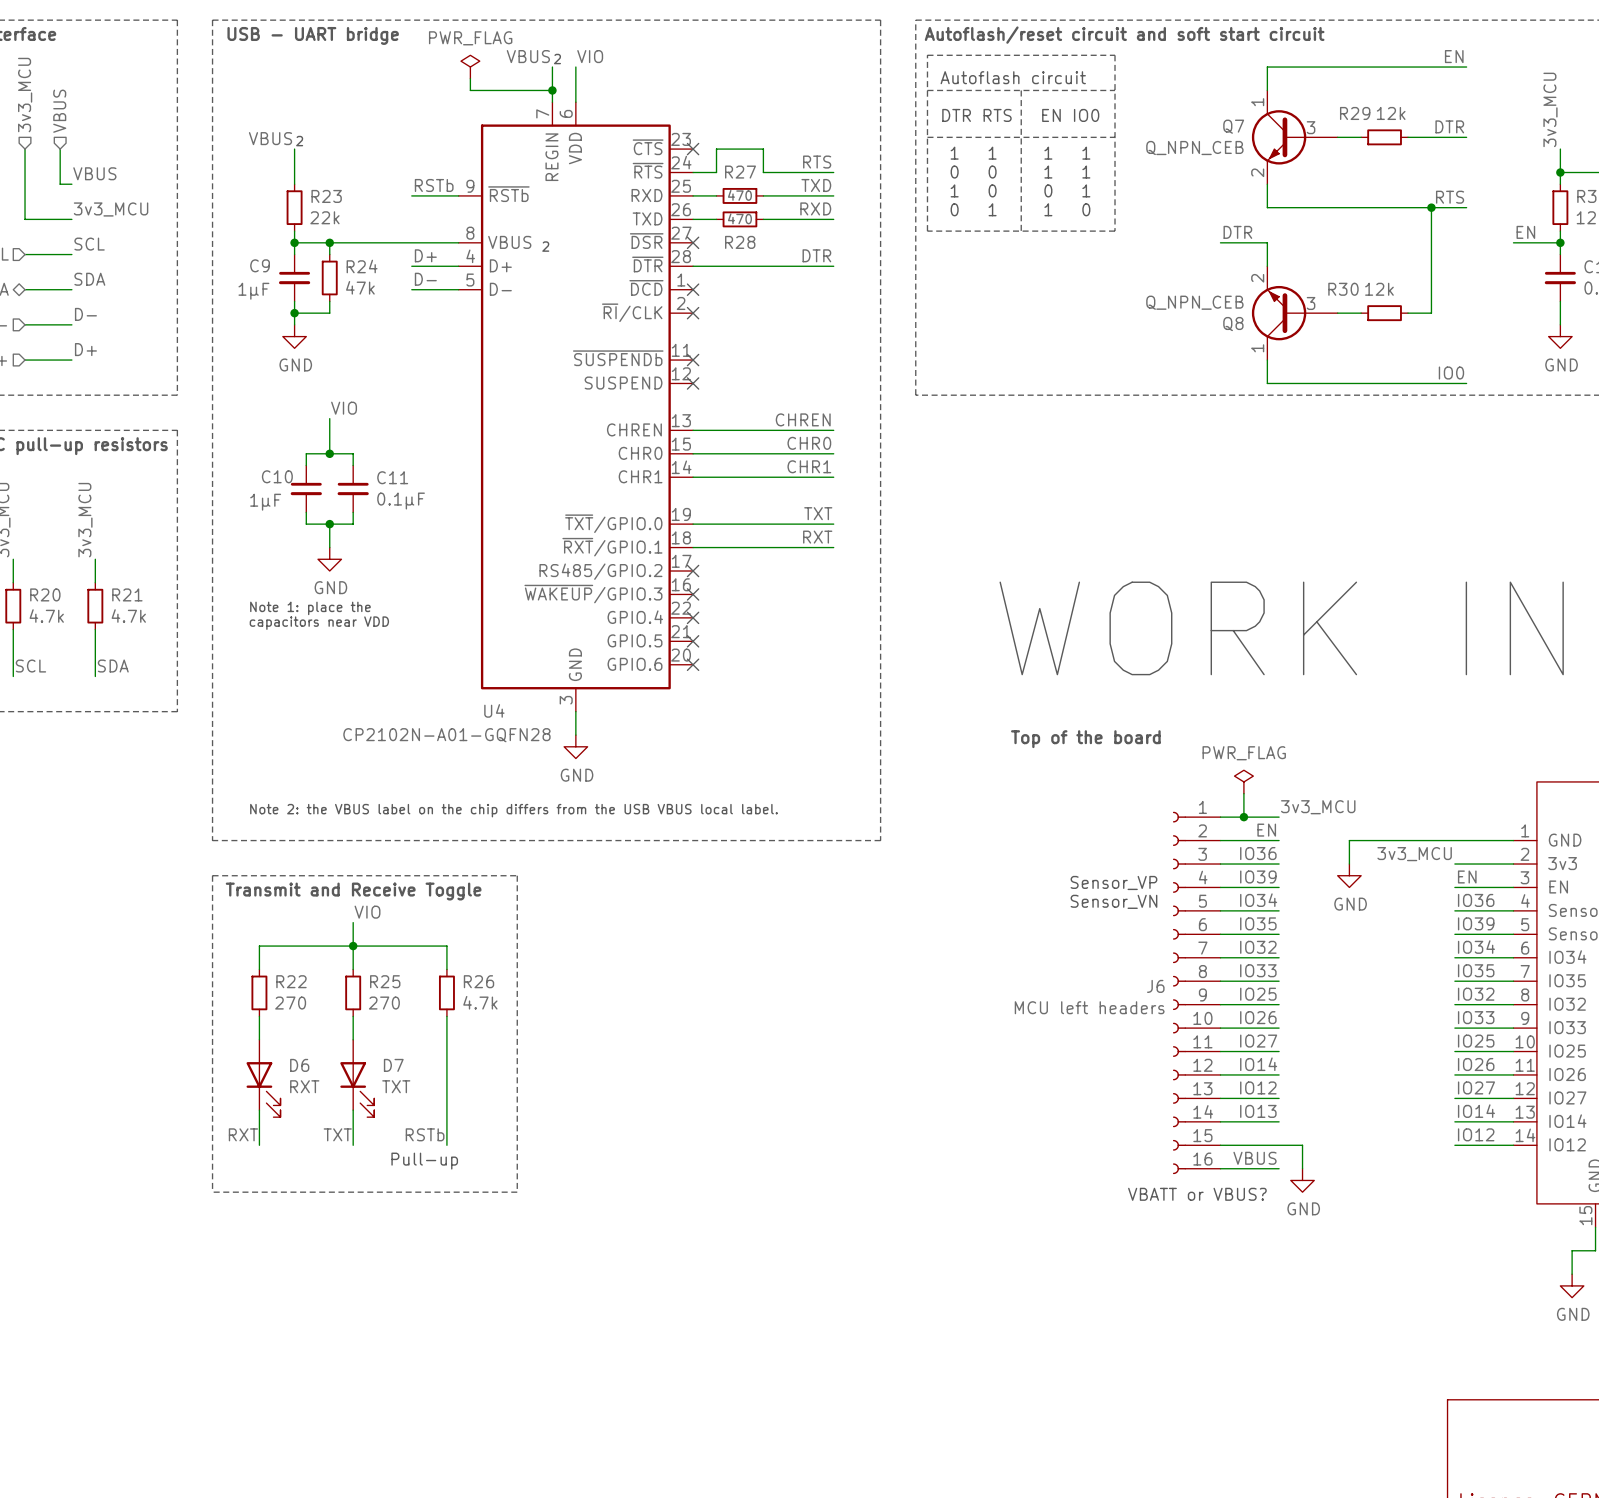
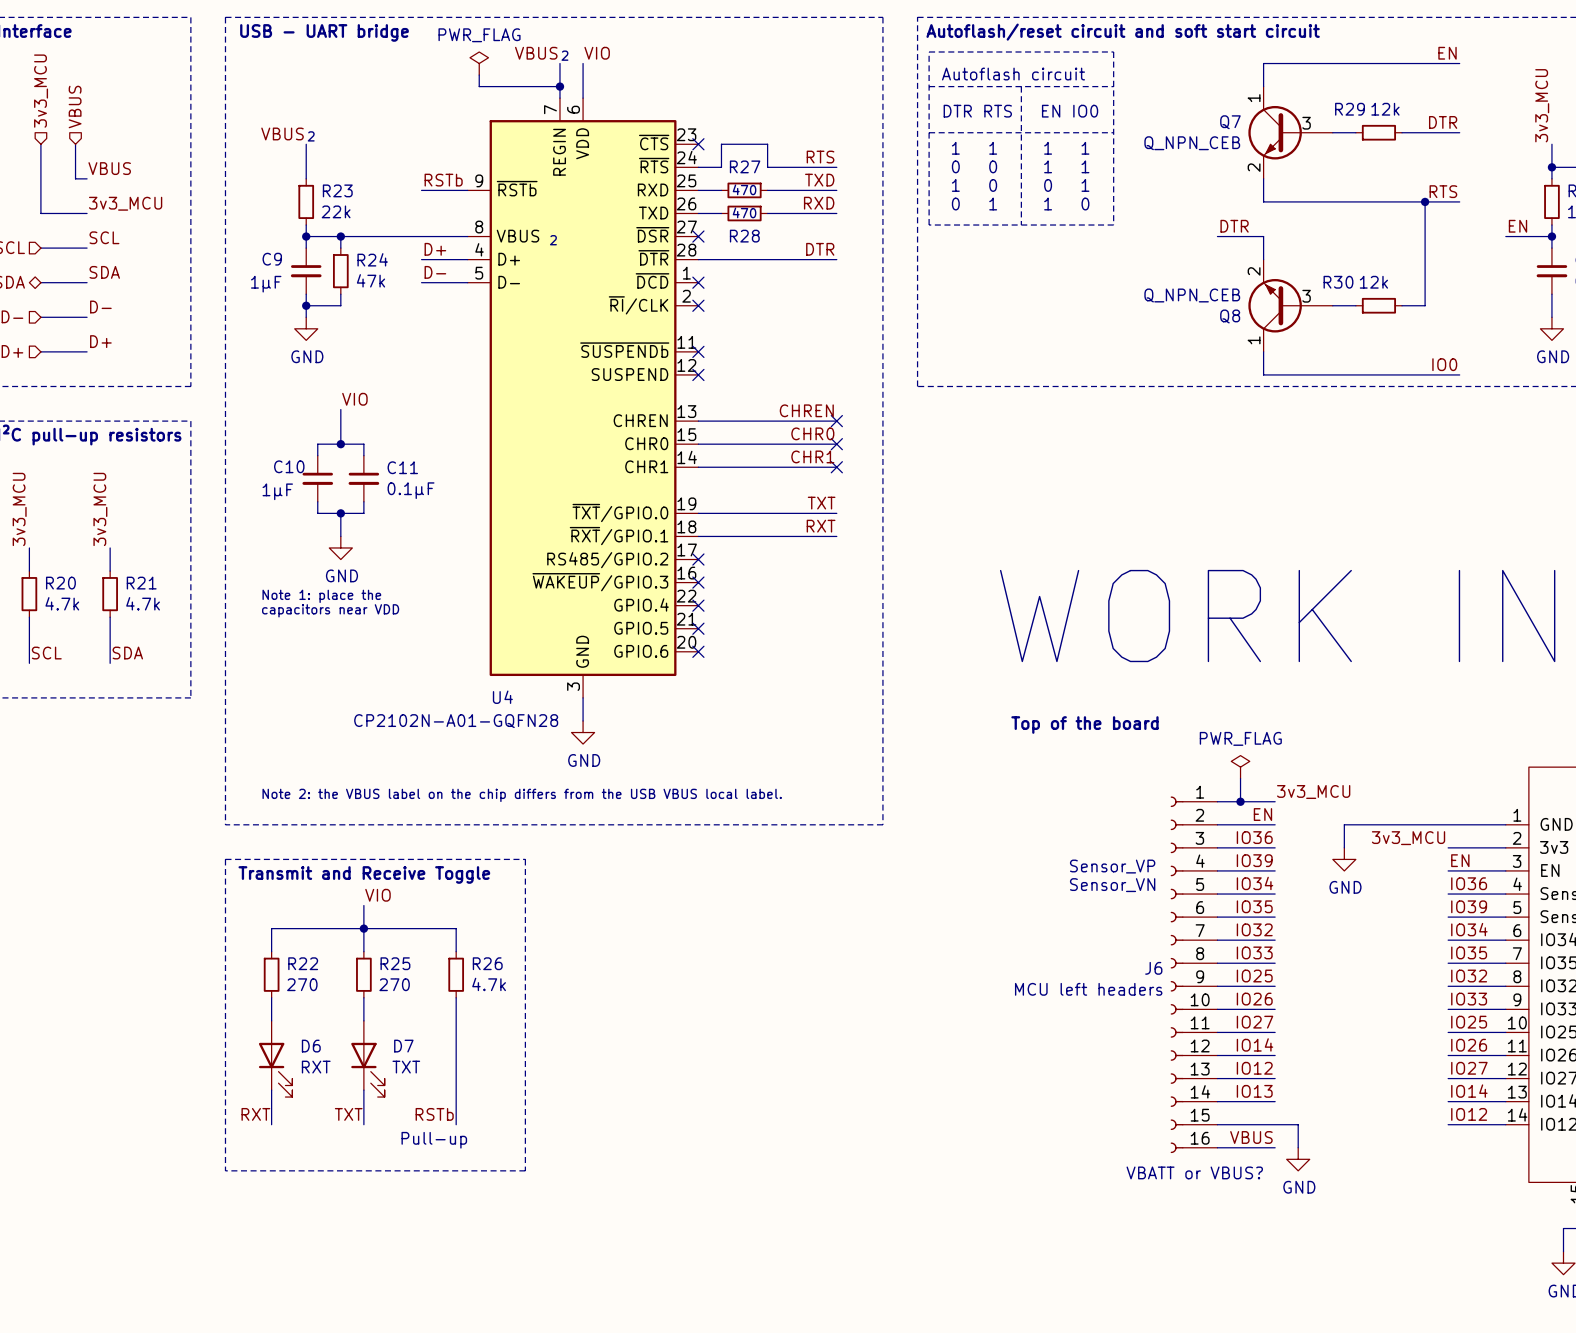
no-connect mark: none -> (836, 421)
no-connect mark: none -> (836, 444)
no-connect mark: none -> (836, 467)

